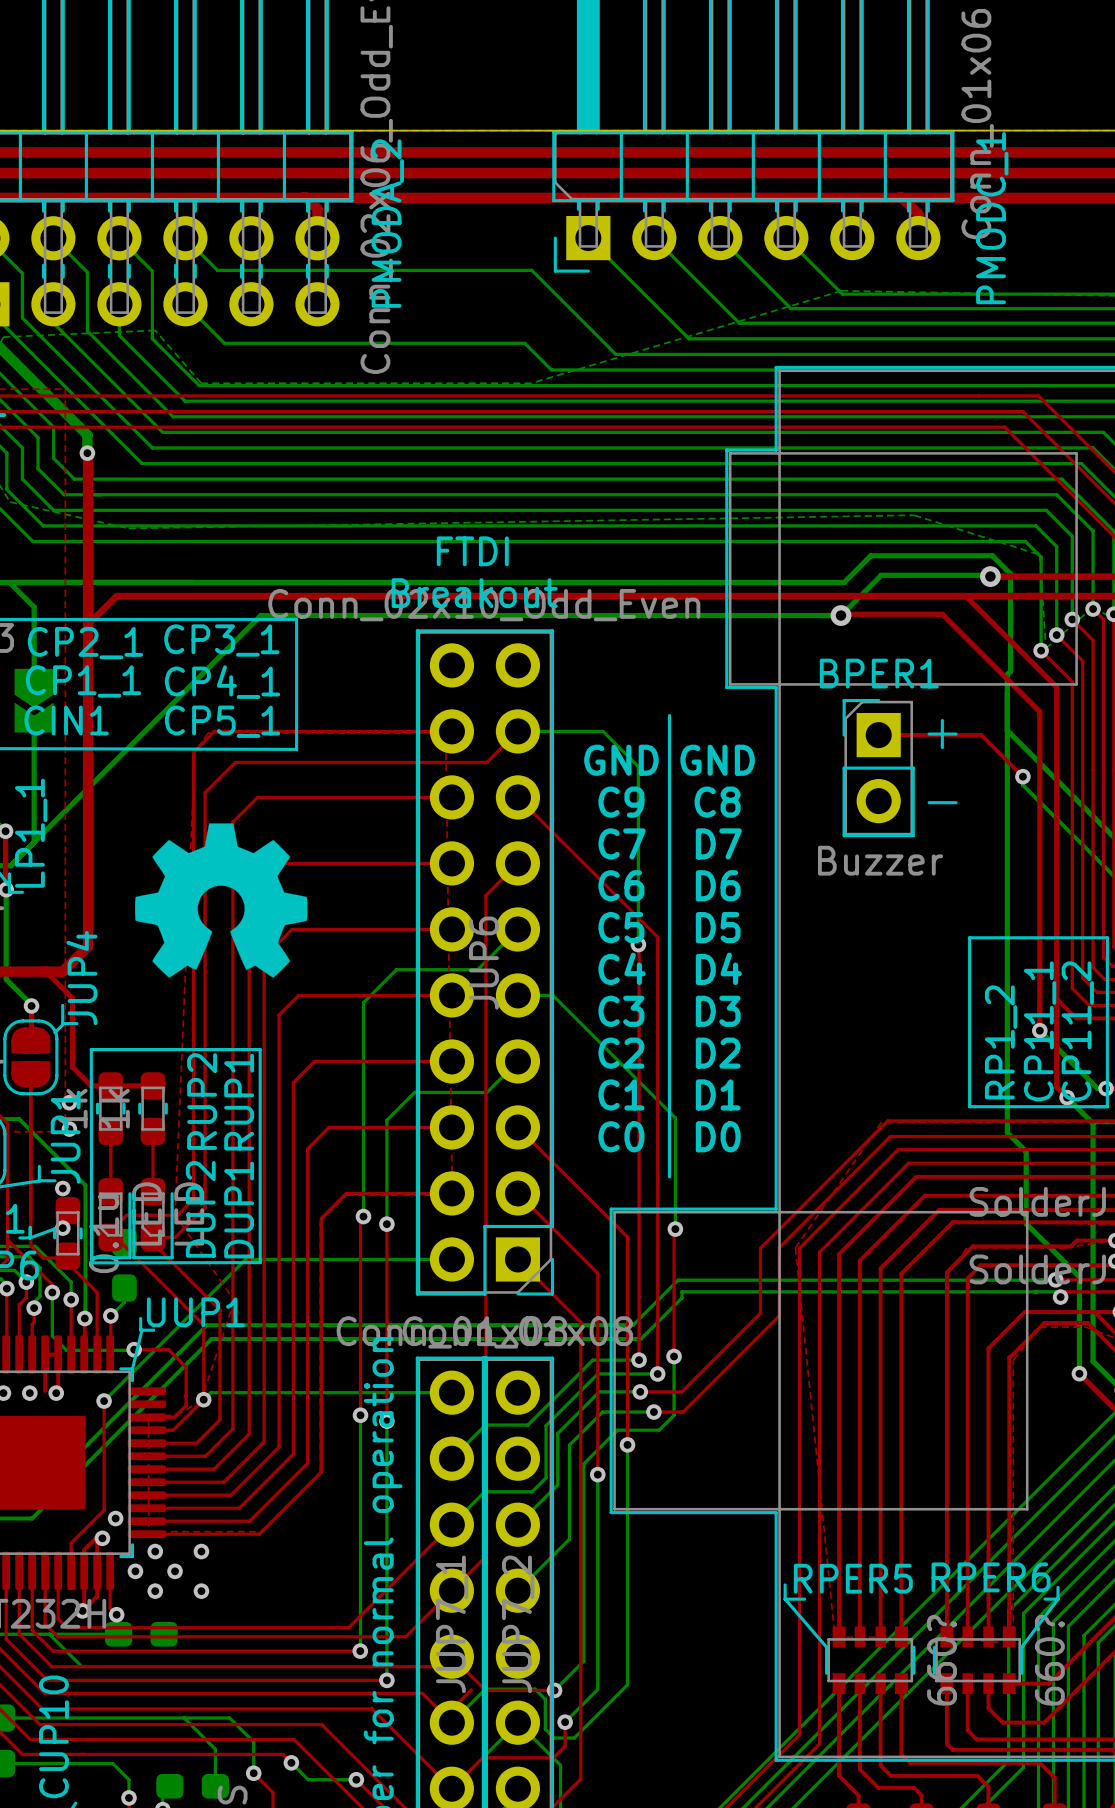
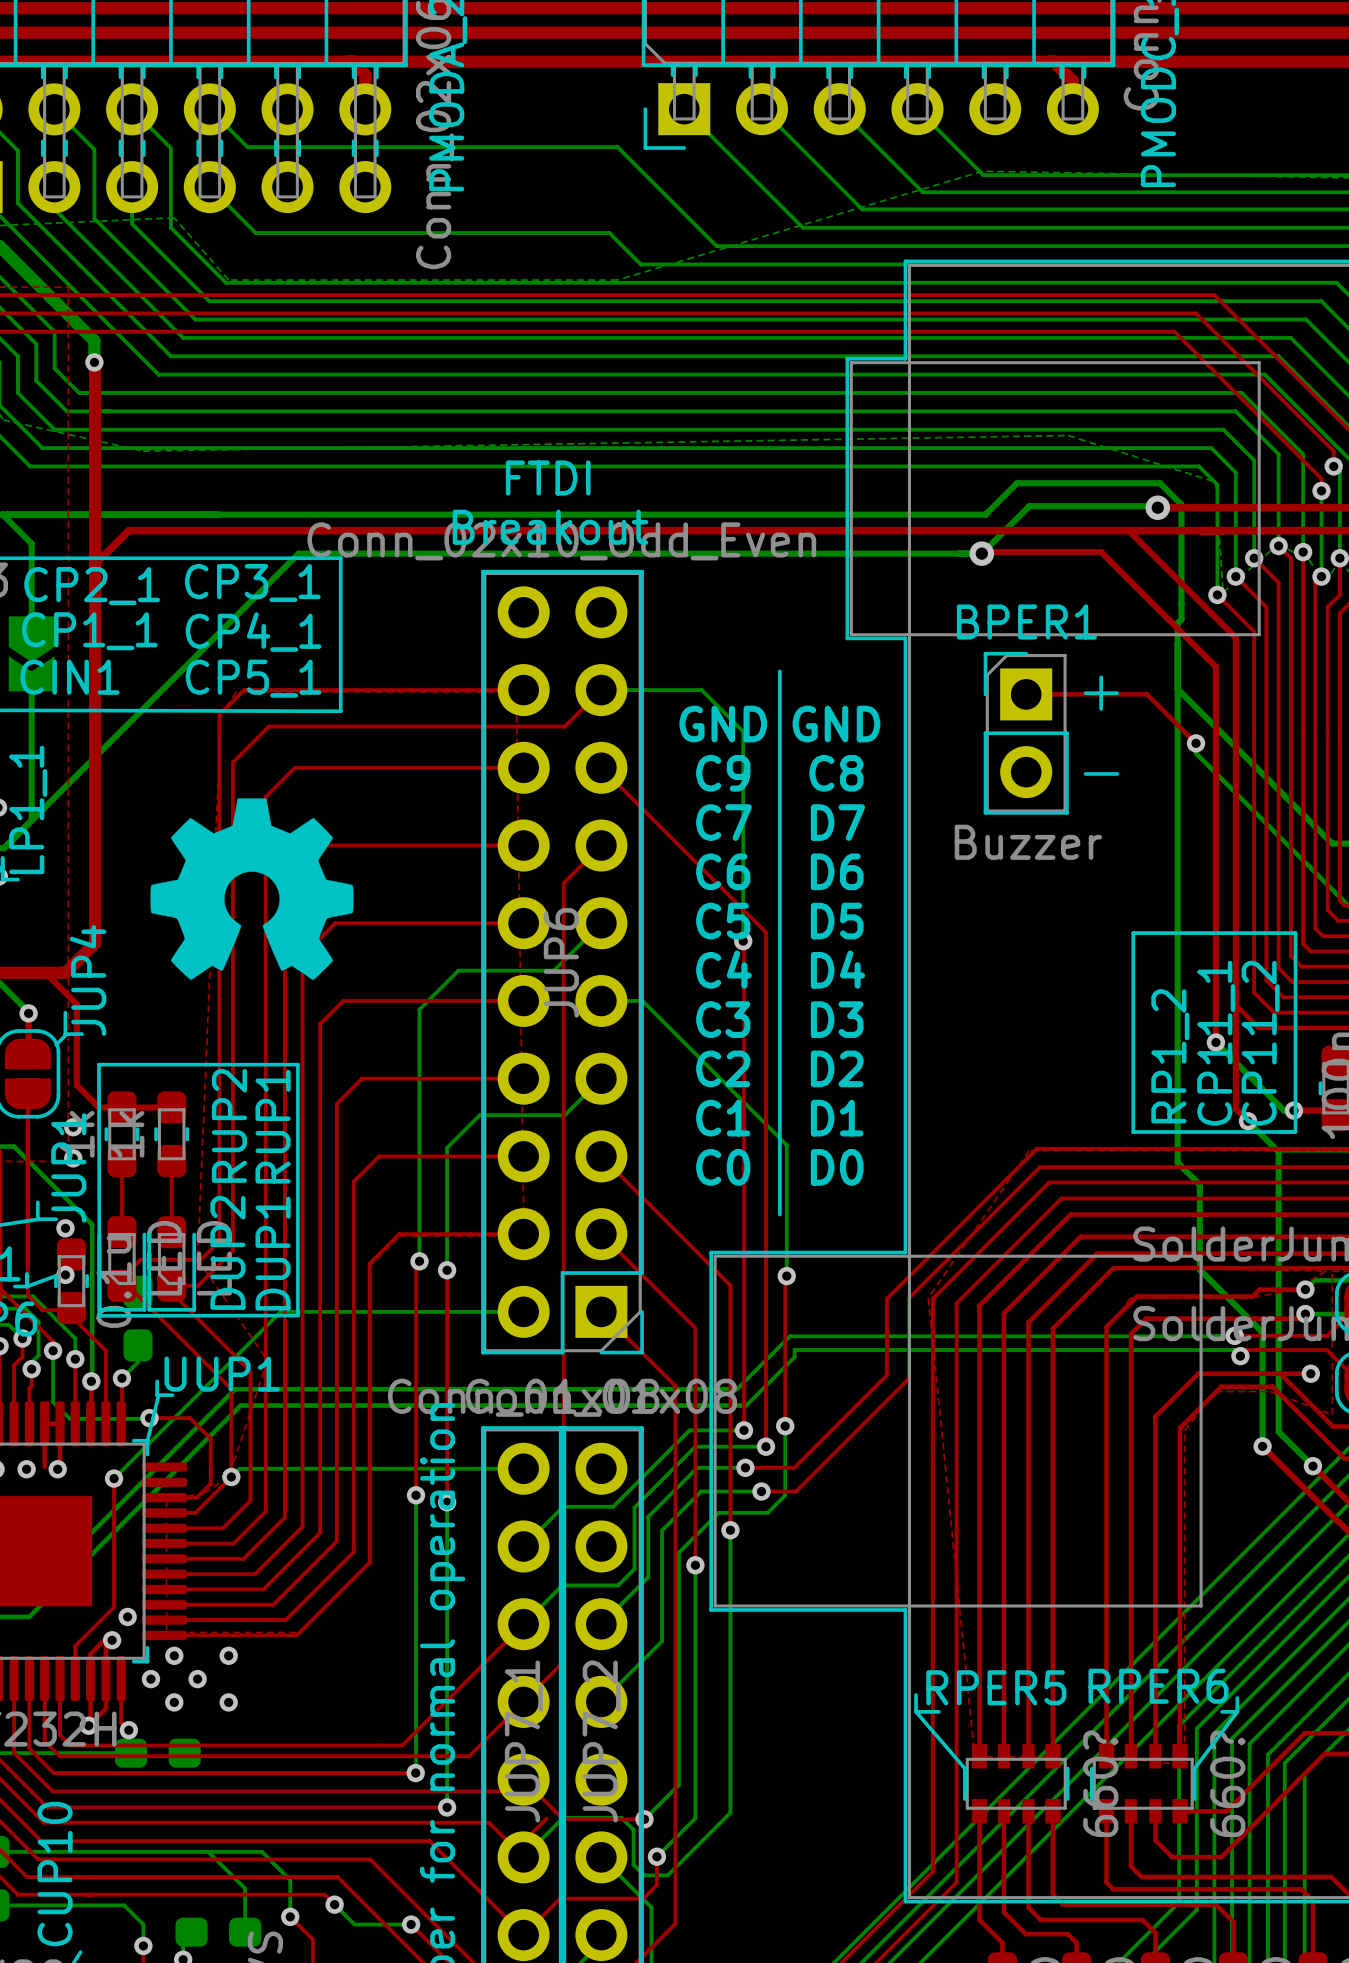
bottom track: (49, 1634) (80, 1665) -> none
bottom track: (517, 1722) (487, 1753) -> none

